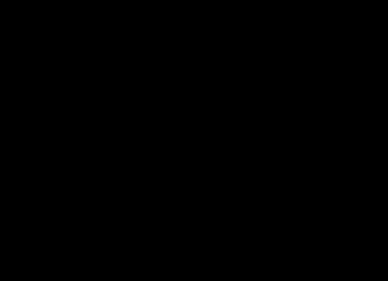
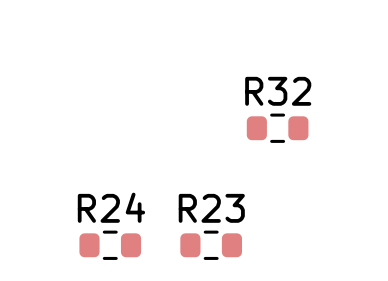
R32: none -> (277, 128)
R24: none -> (110, 245)
R23: none -> (211, 245)

